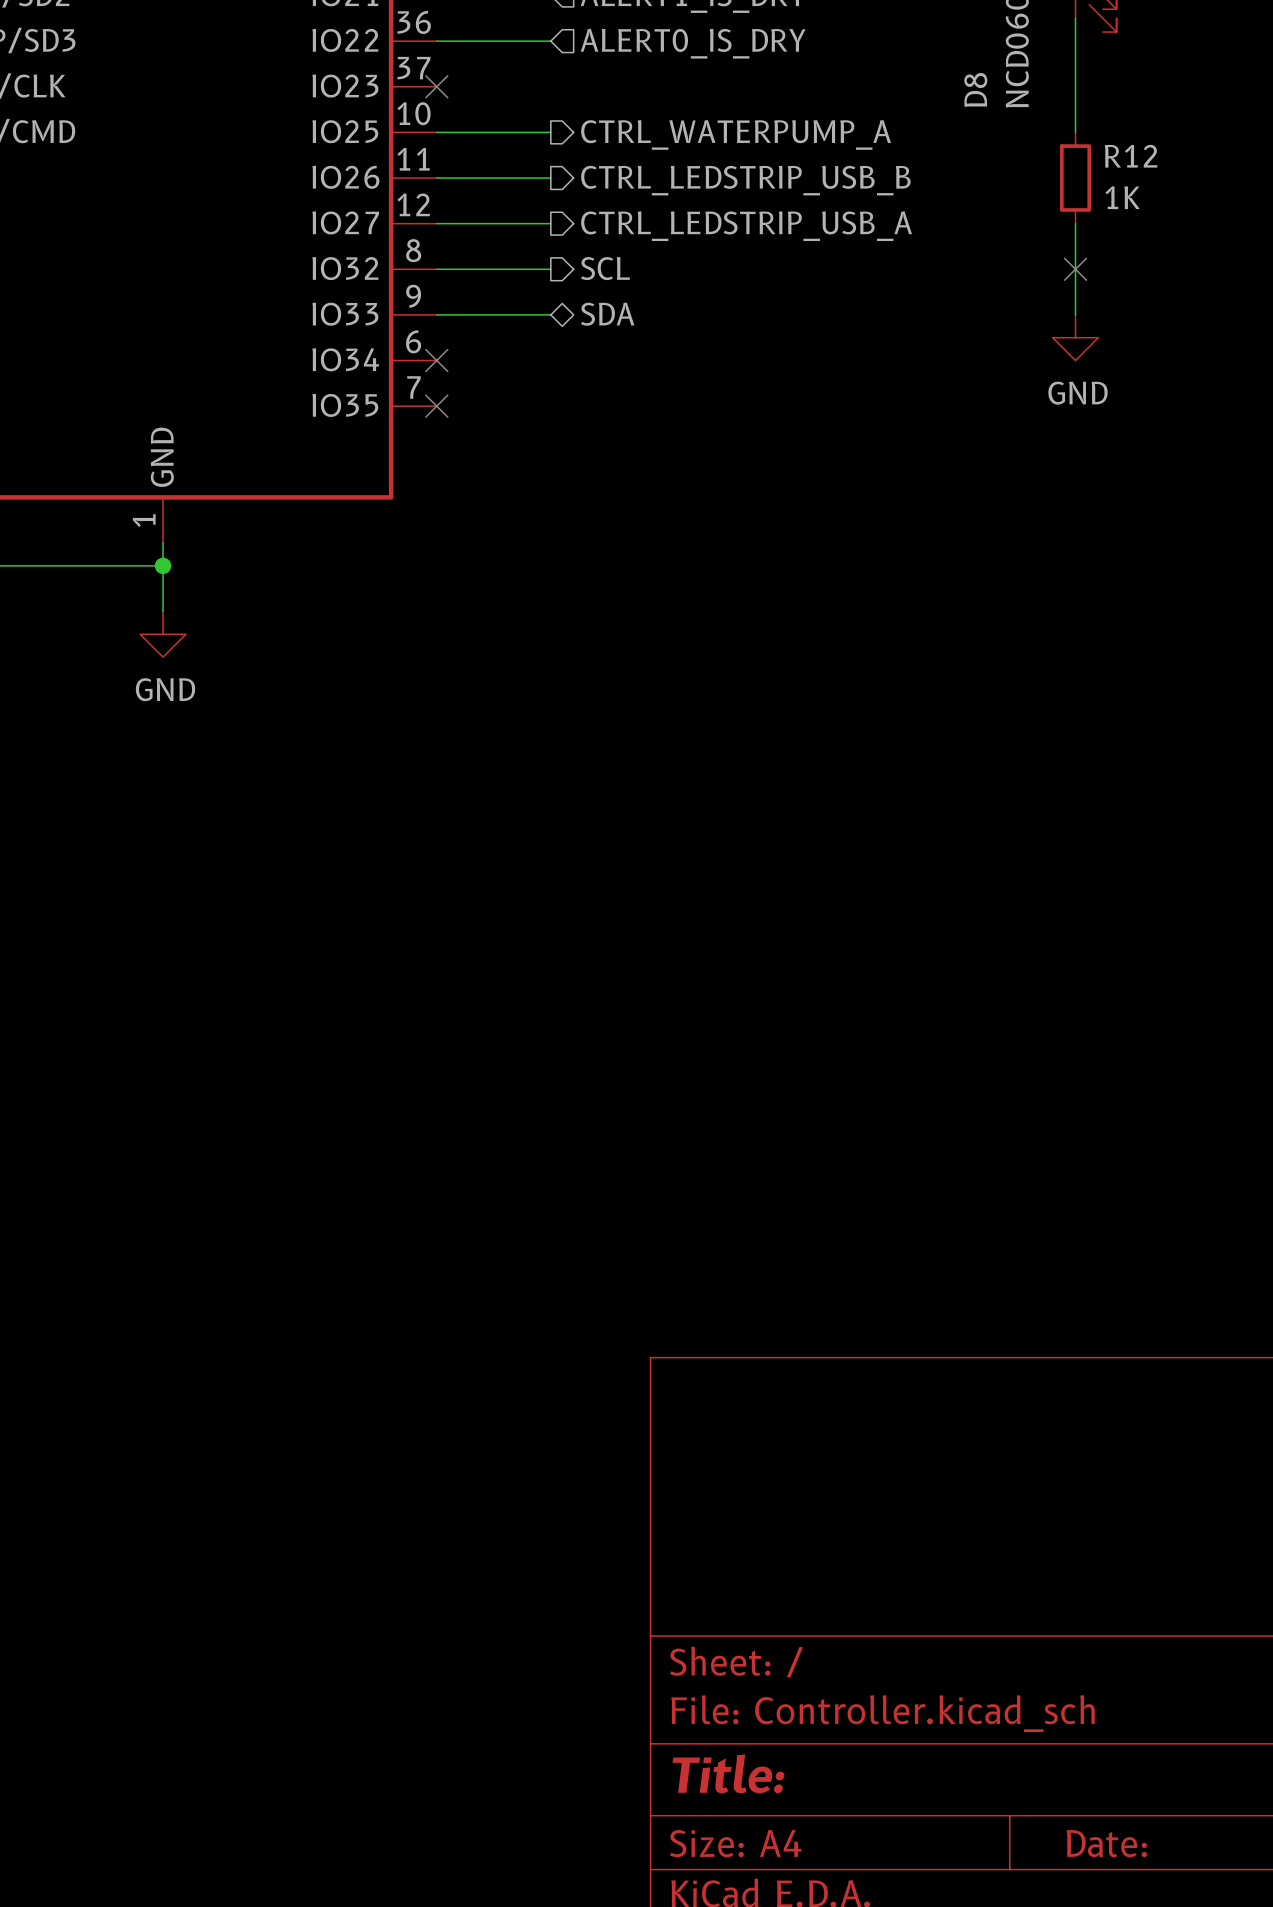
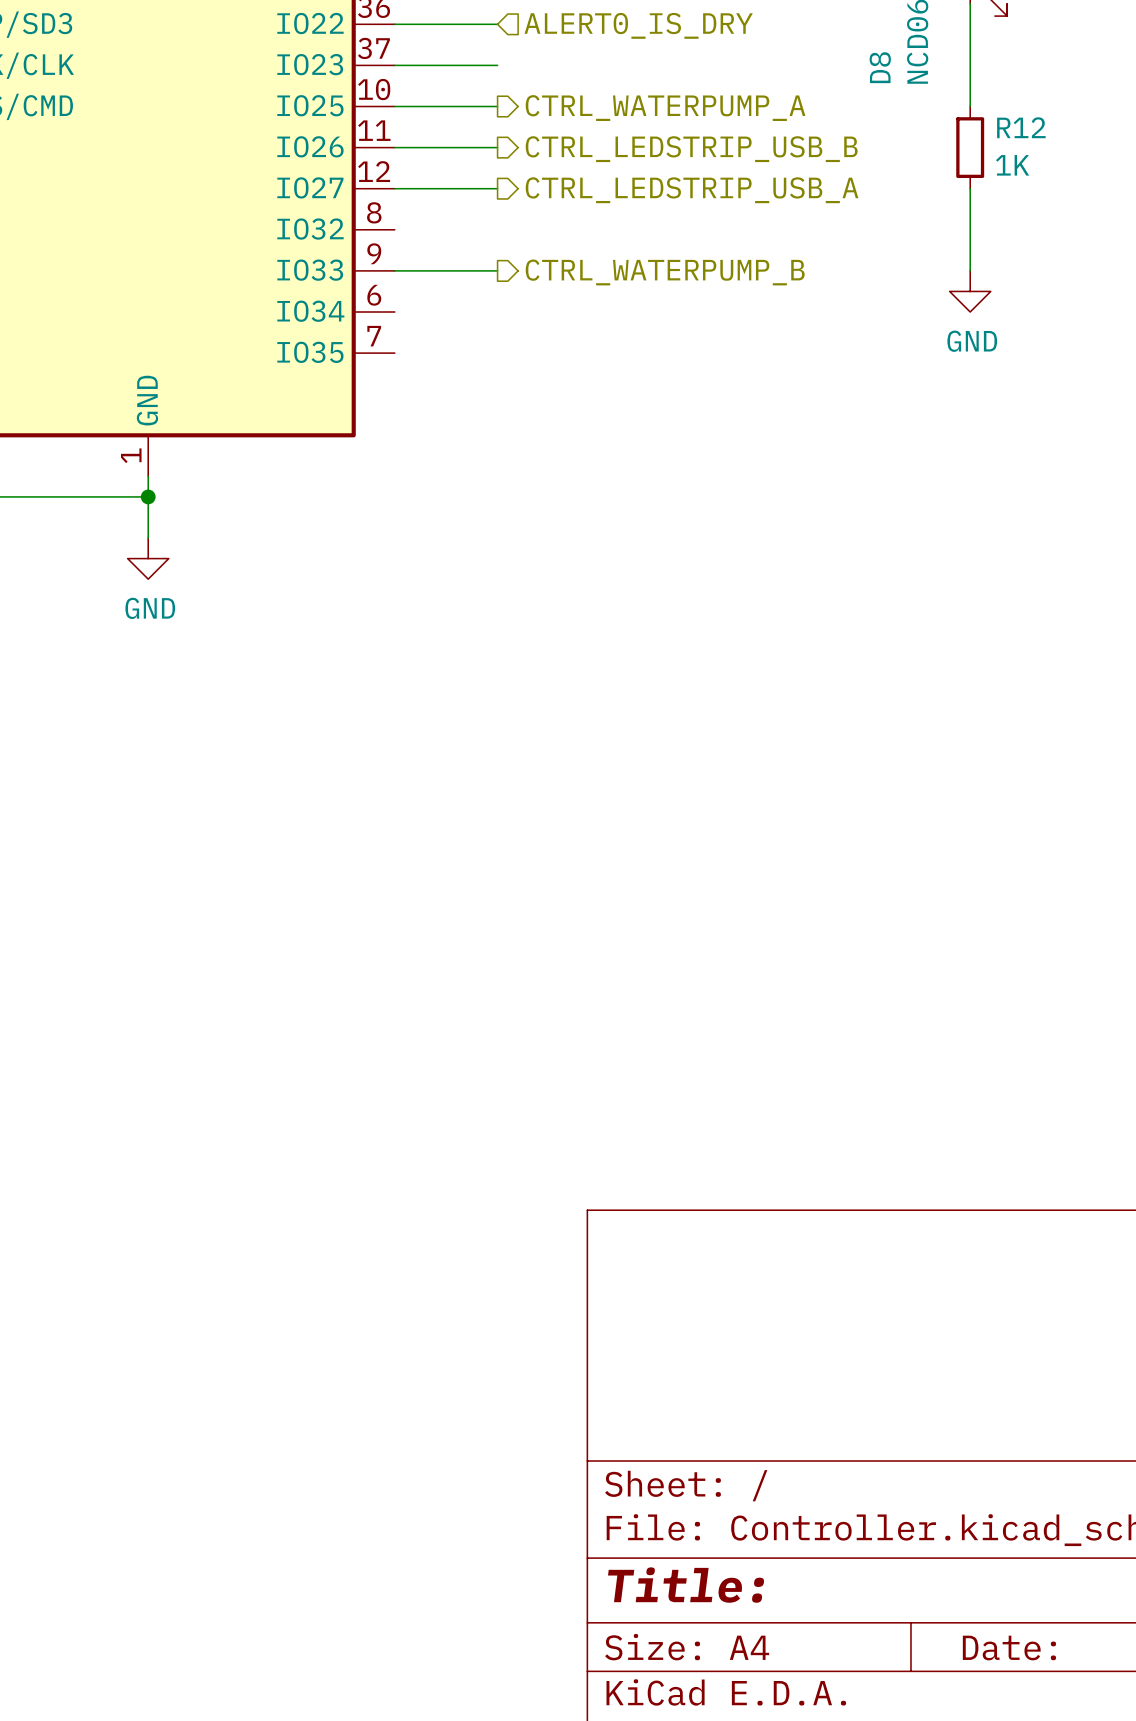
no-connect mark: (436, 86) -> none
hierarchical label: SCL (605, 268) -> none
wire: (436, 269) (550, 269) -> (394, 65) (497, 65)
no-connect mark: (1075, 269) -> none
hierarchical label shape: bidirectional (607, 314) -> output (665, 272)
hierarchical label: SDA (607, 314) -> CTRL_WATERPUMP_B (665, 272)
no-connect mark: (436, 360) -> none
no-connect mark: (436, 406) -> none

